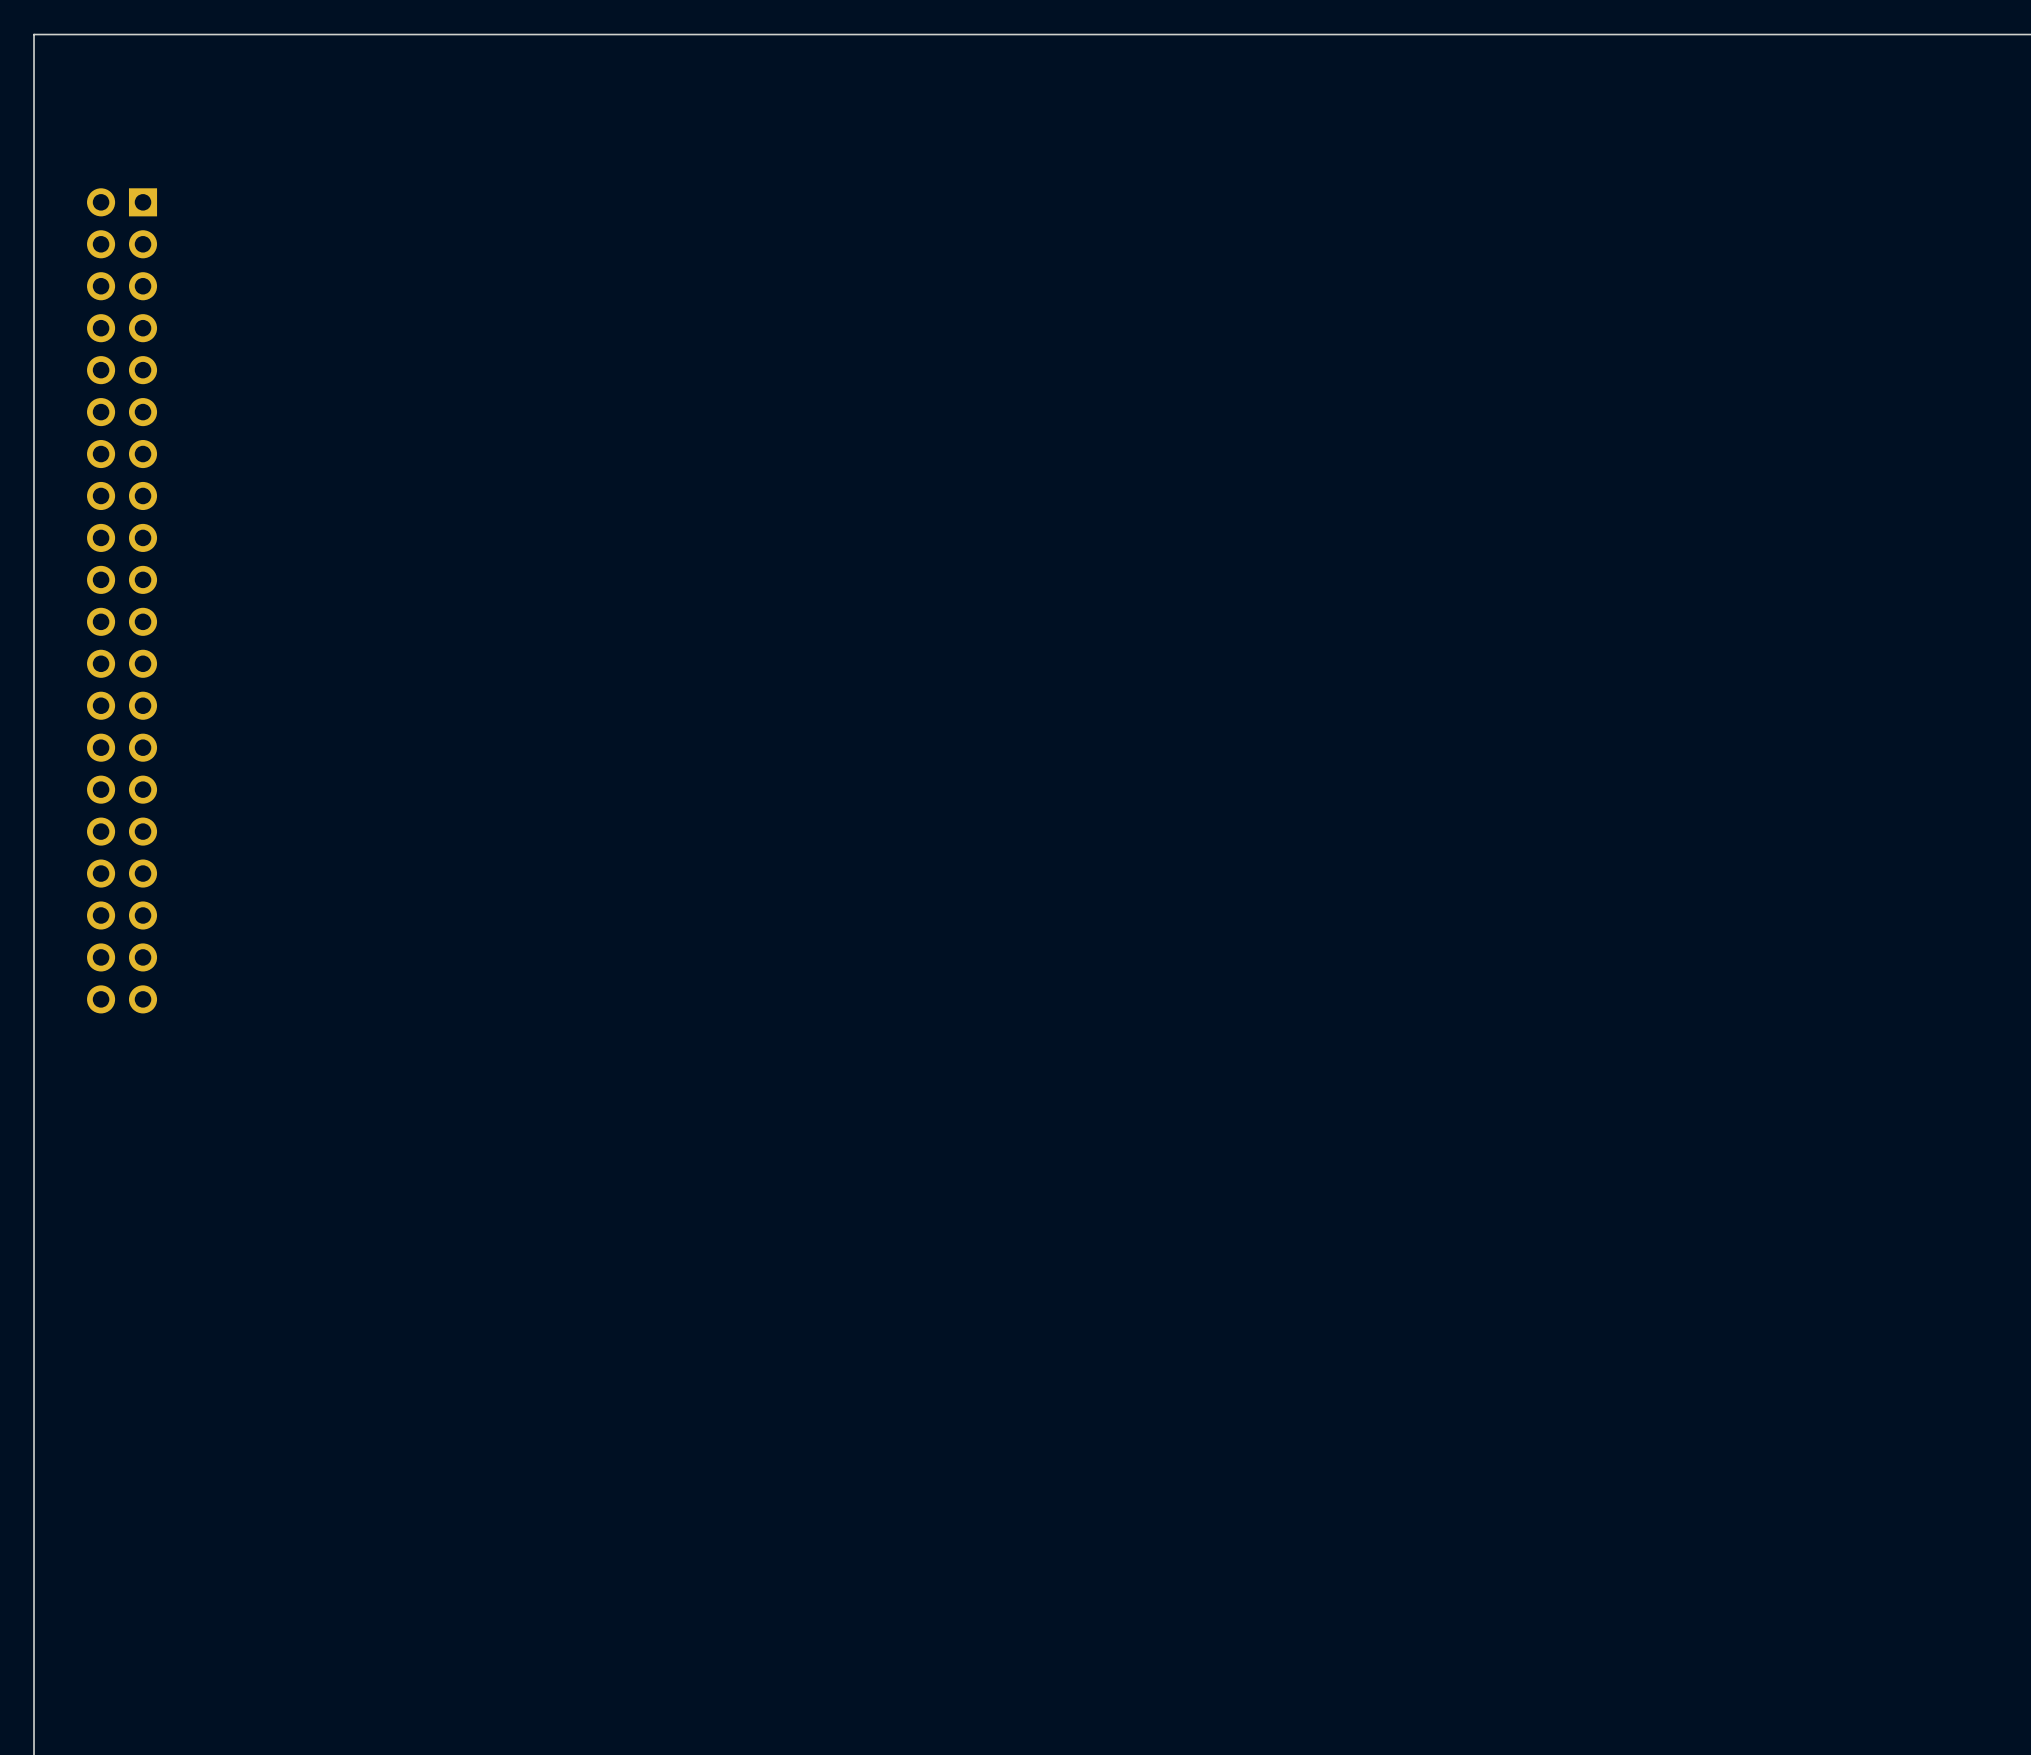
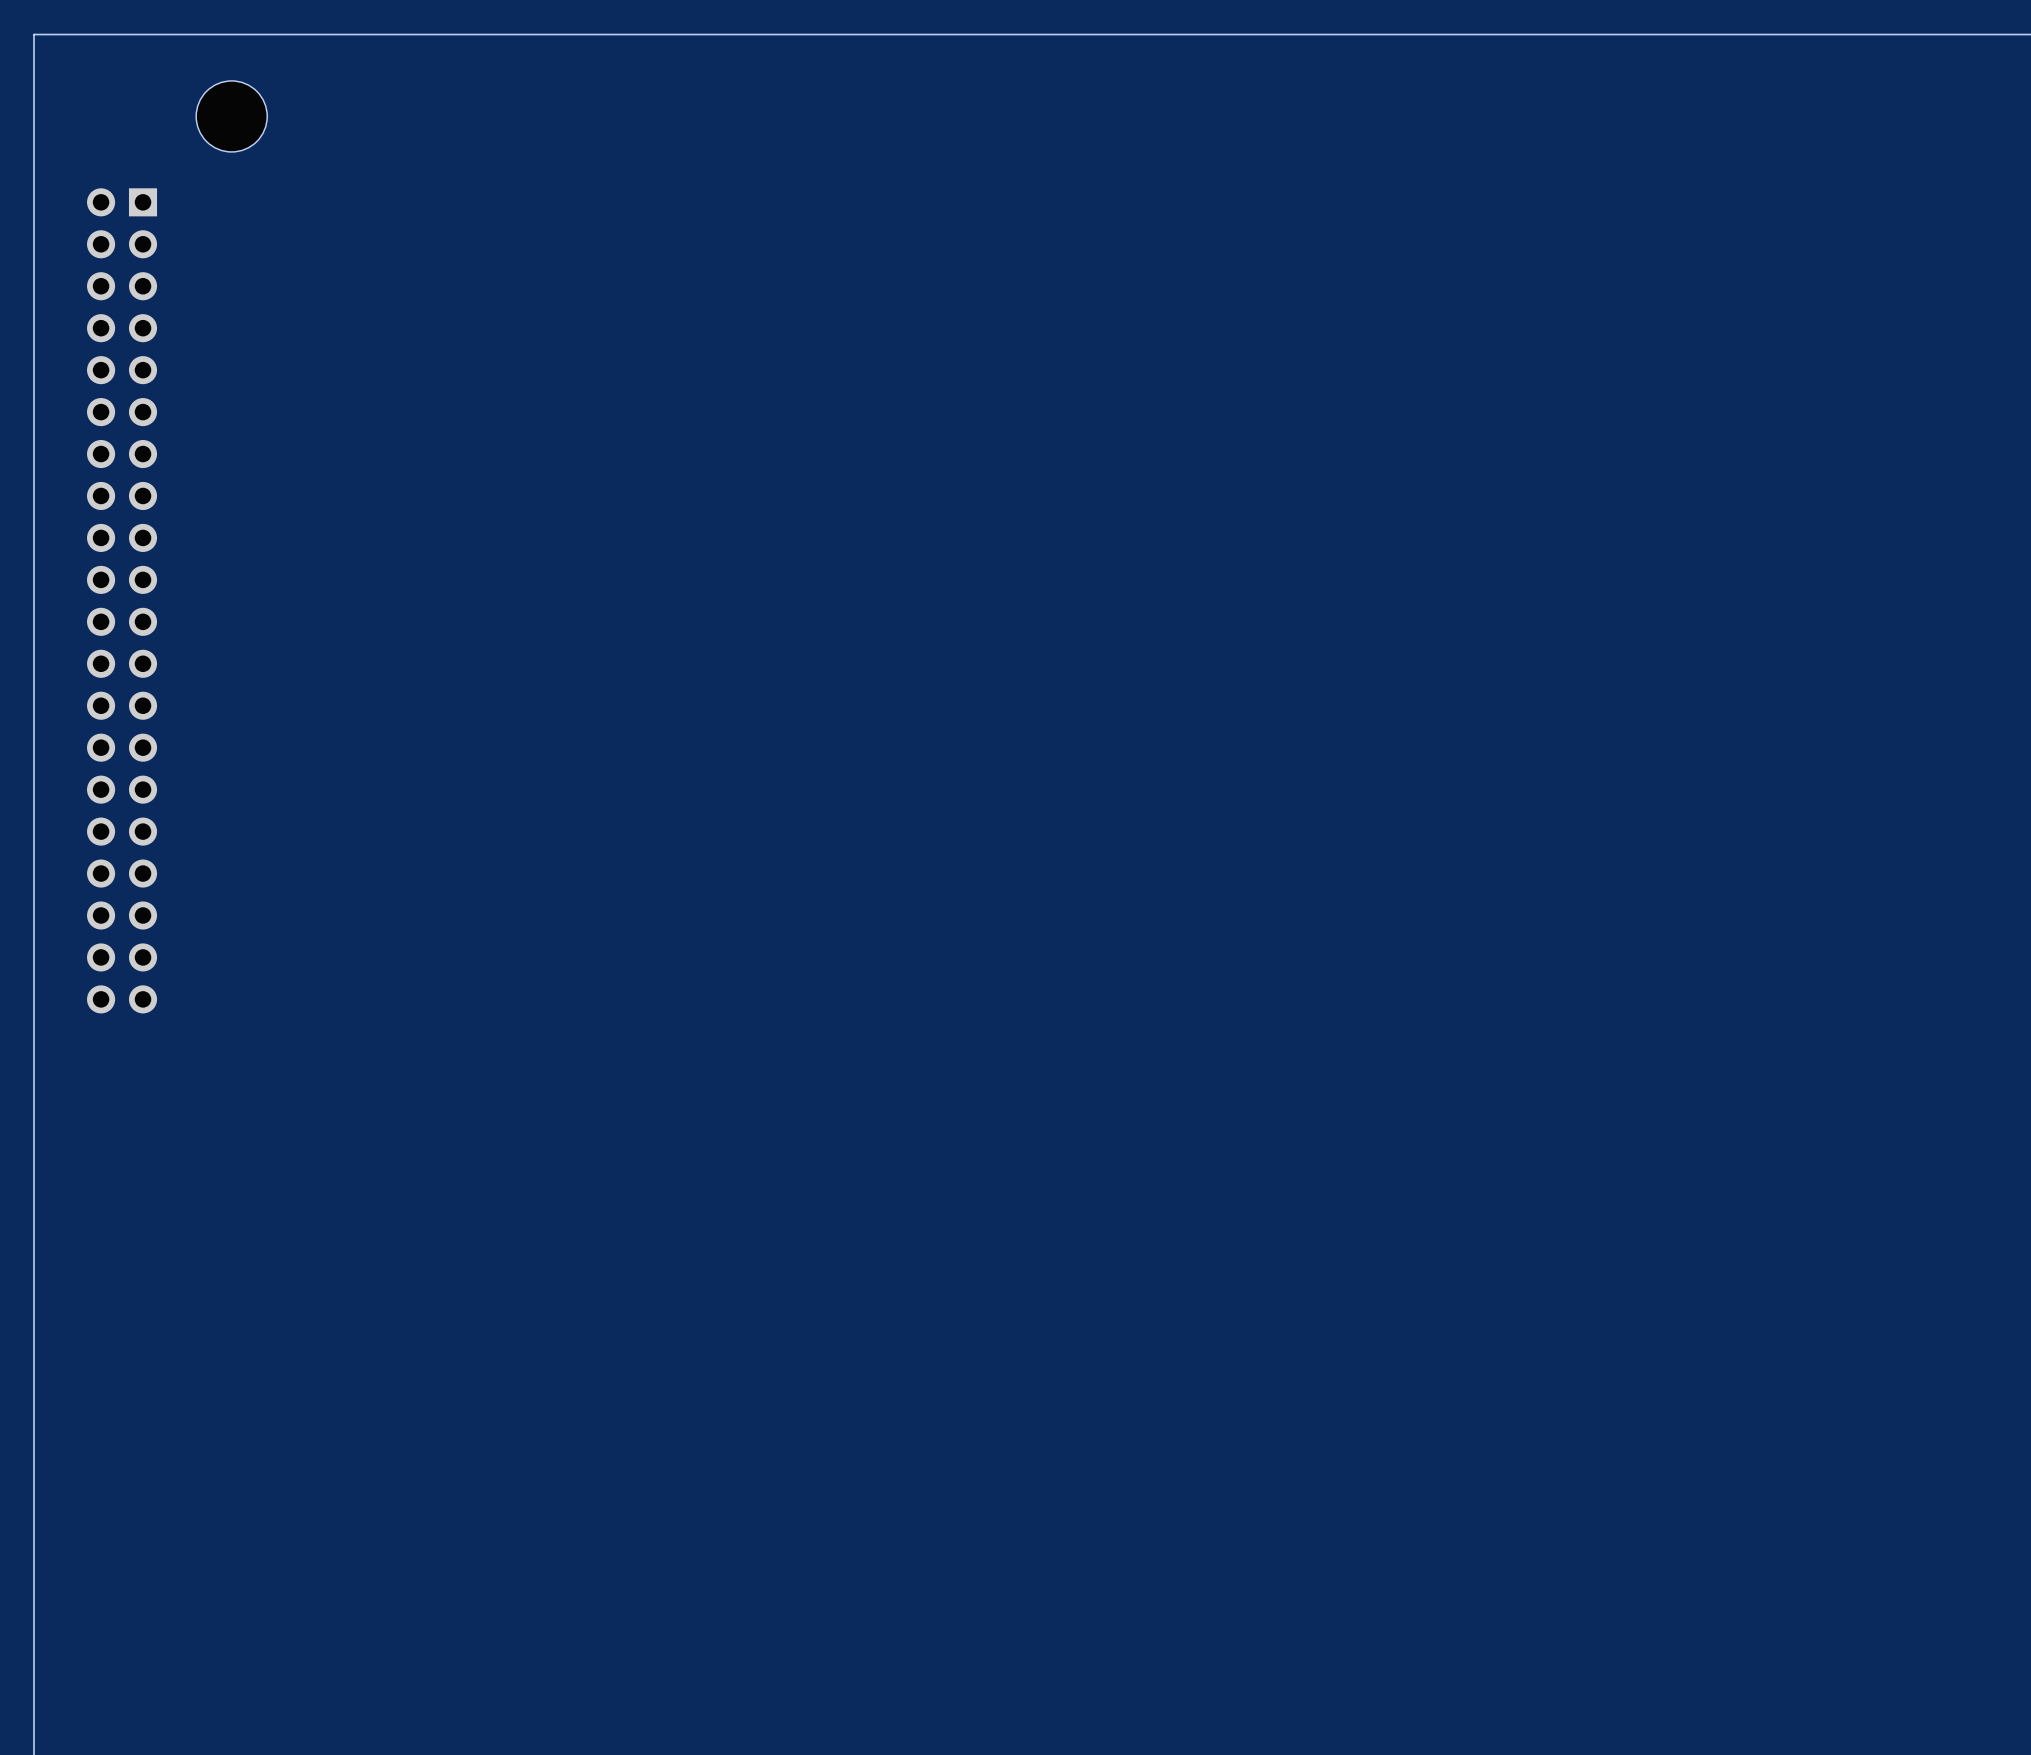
part: none -> (231, 116)

